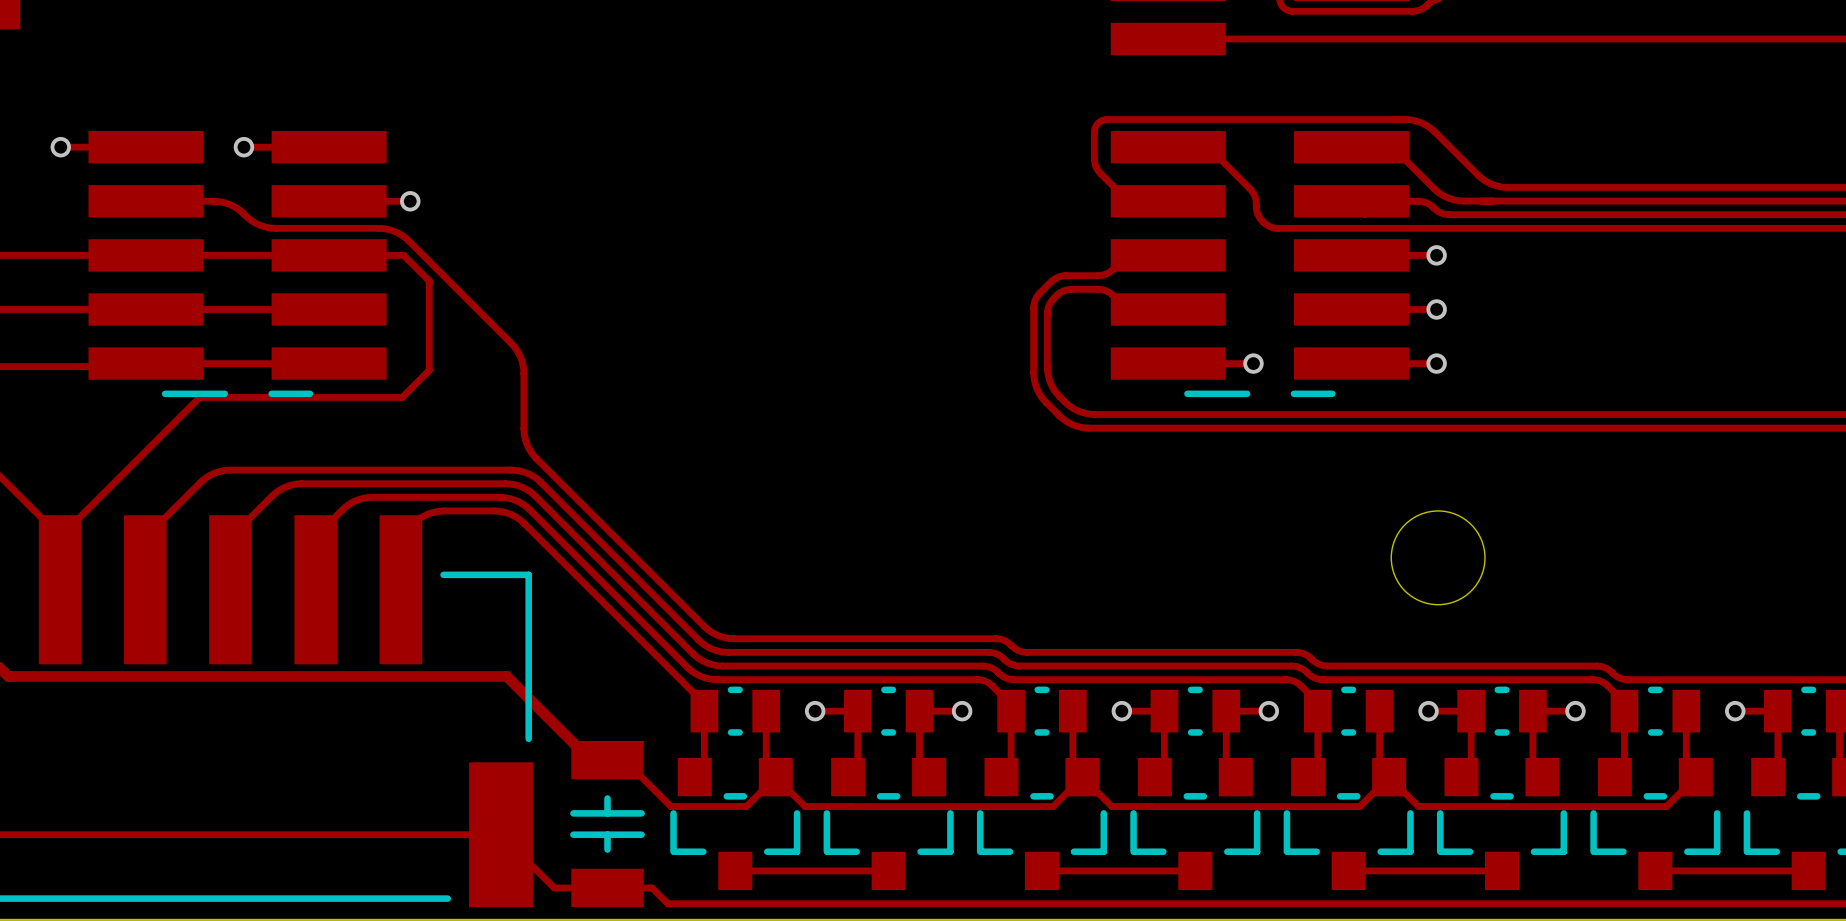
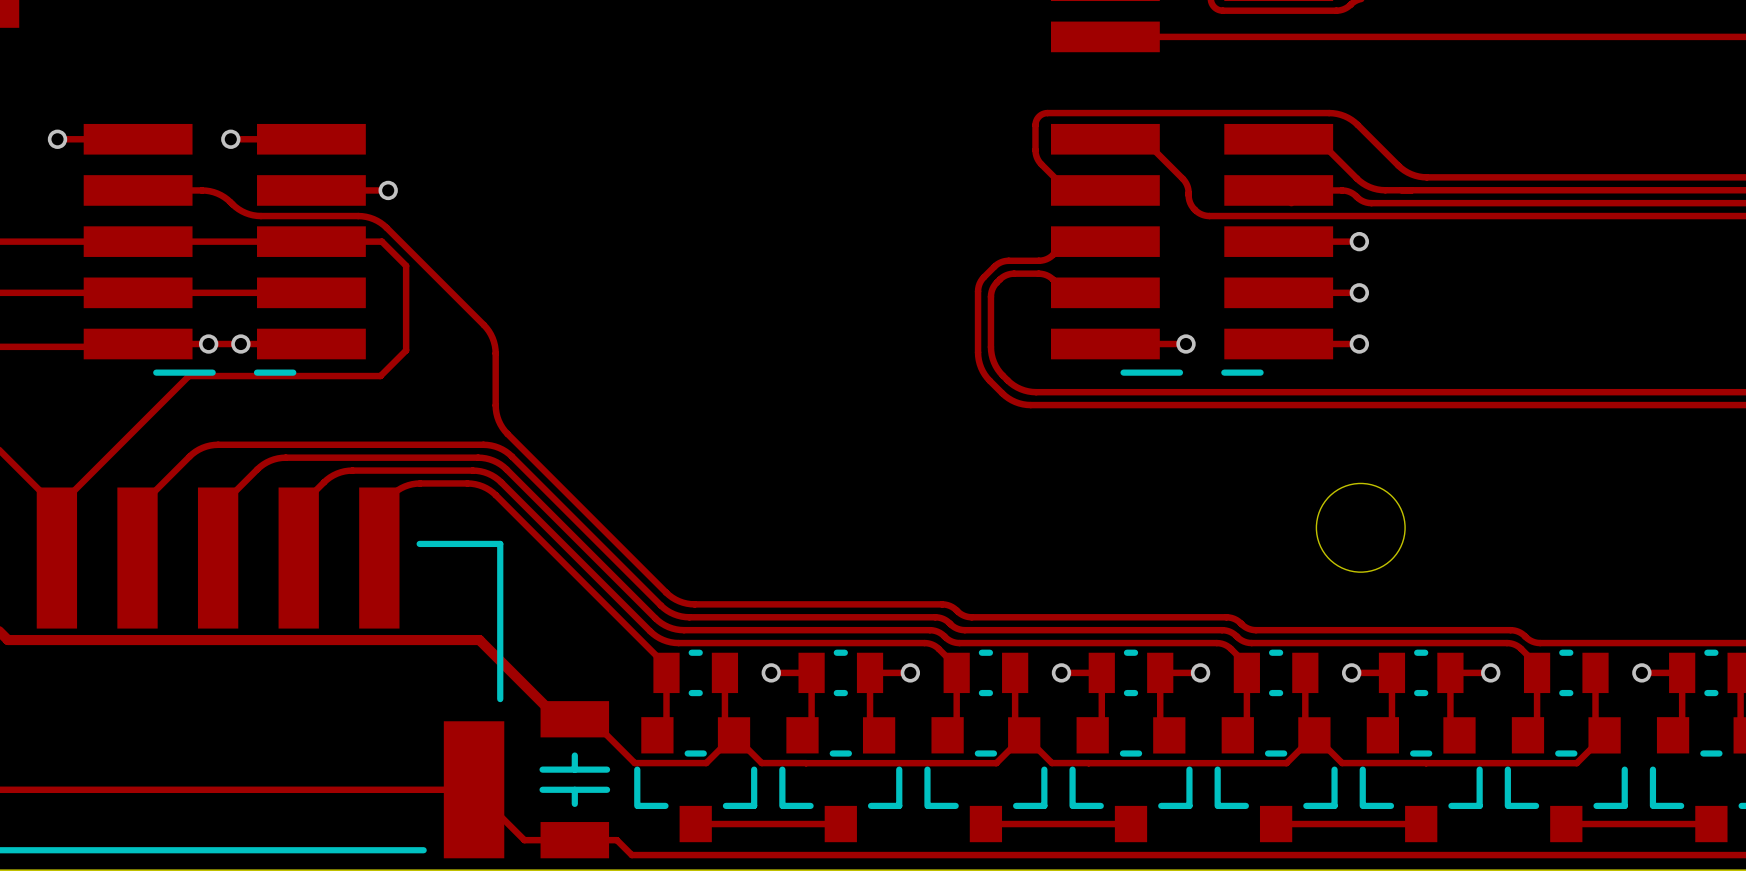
via: none -> (208, 344)
via: none -> (240, 344)

